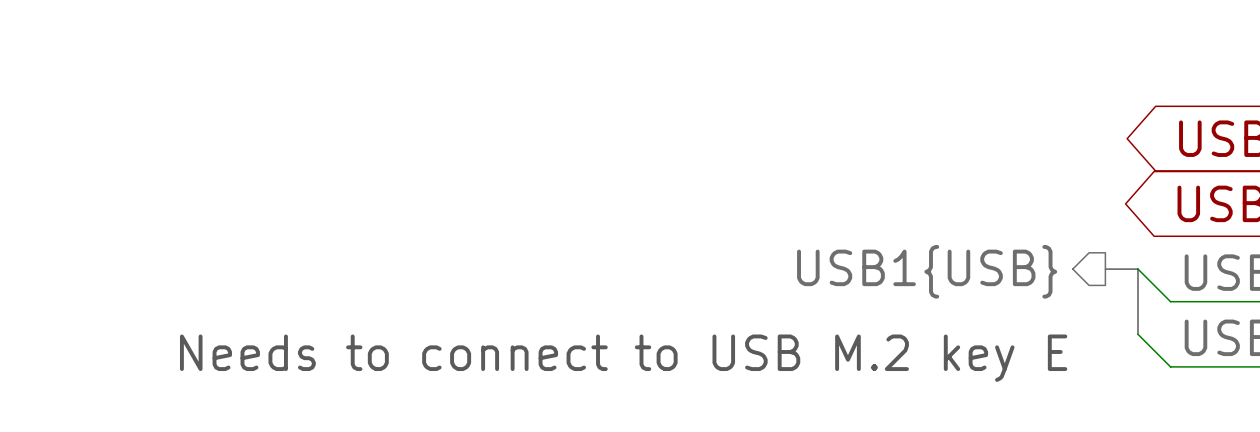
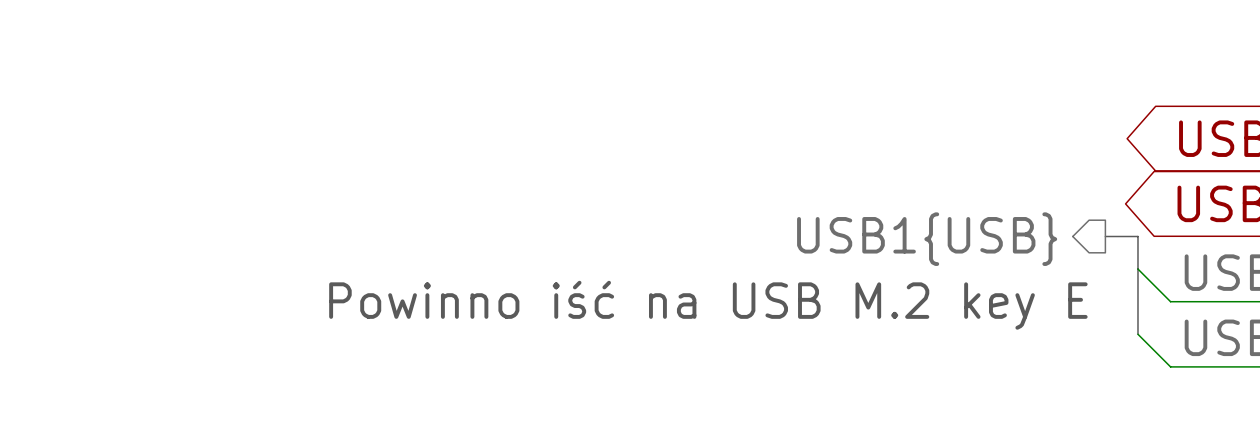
bus: (1105, 269) (1137, 269) -> (1105, 236) (1137, 236) (1137, 269)
hierarchical label position: USB1{USB} (927, 271) -> USB1{USB} (927, 239)
text: none -> Powinno iść na USB M.2 key E (708, 305)
text: Needs to connect to USB M.2 key E (623, 358) -> none

